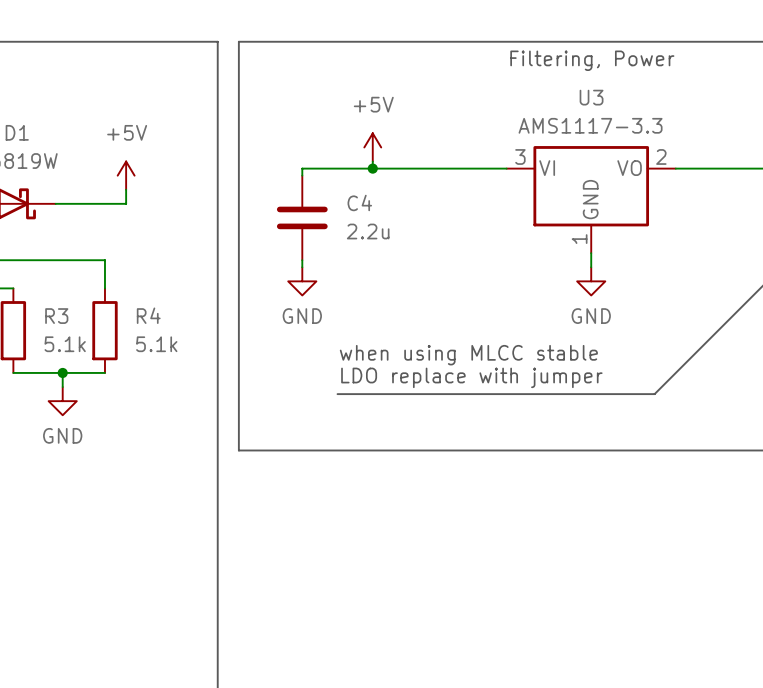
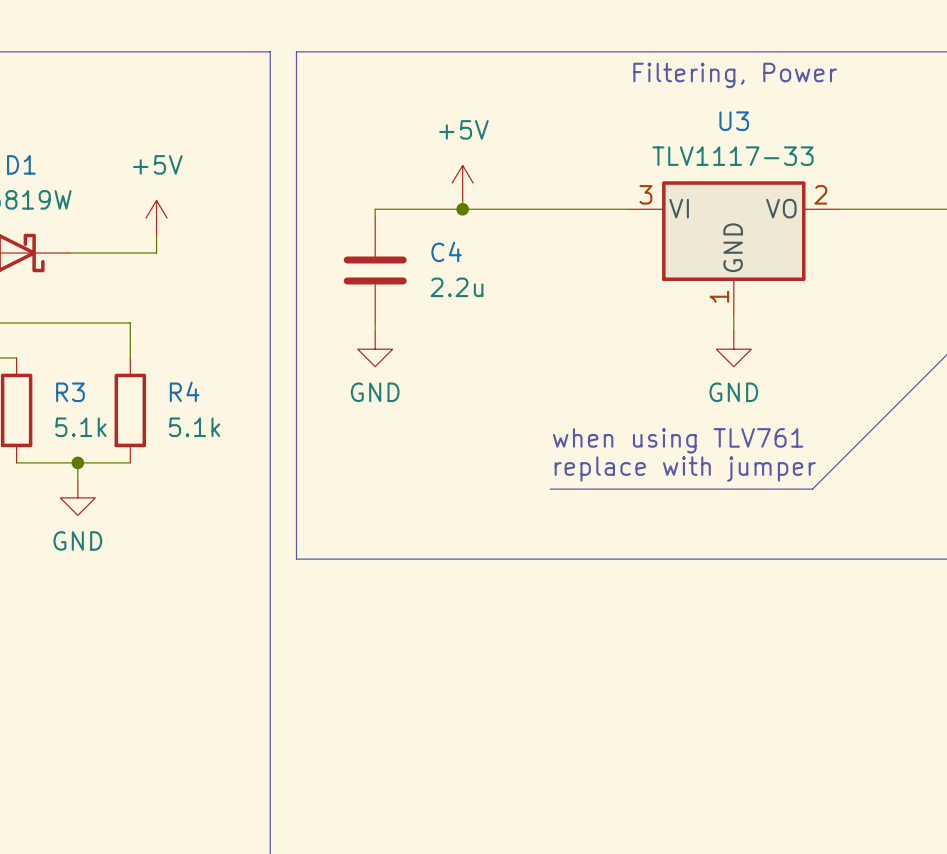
U3 value: AMS1117-3.3 (590, 125) -> TLV1117-33 (732, 156)
text: when using MLCC stable (468, 355) -> when using TLV761 (678, 440)
text: LDO replace with jumper (471, 377) -> replace with jumper (685, 468)
line: (337, 394) (443, 394) -> none

